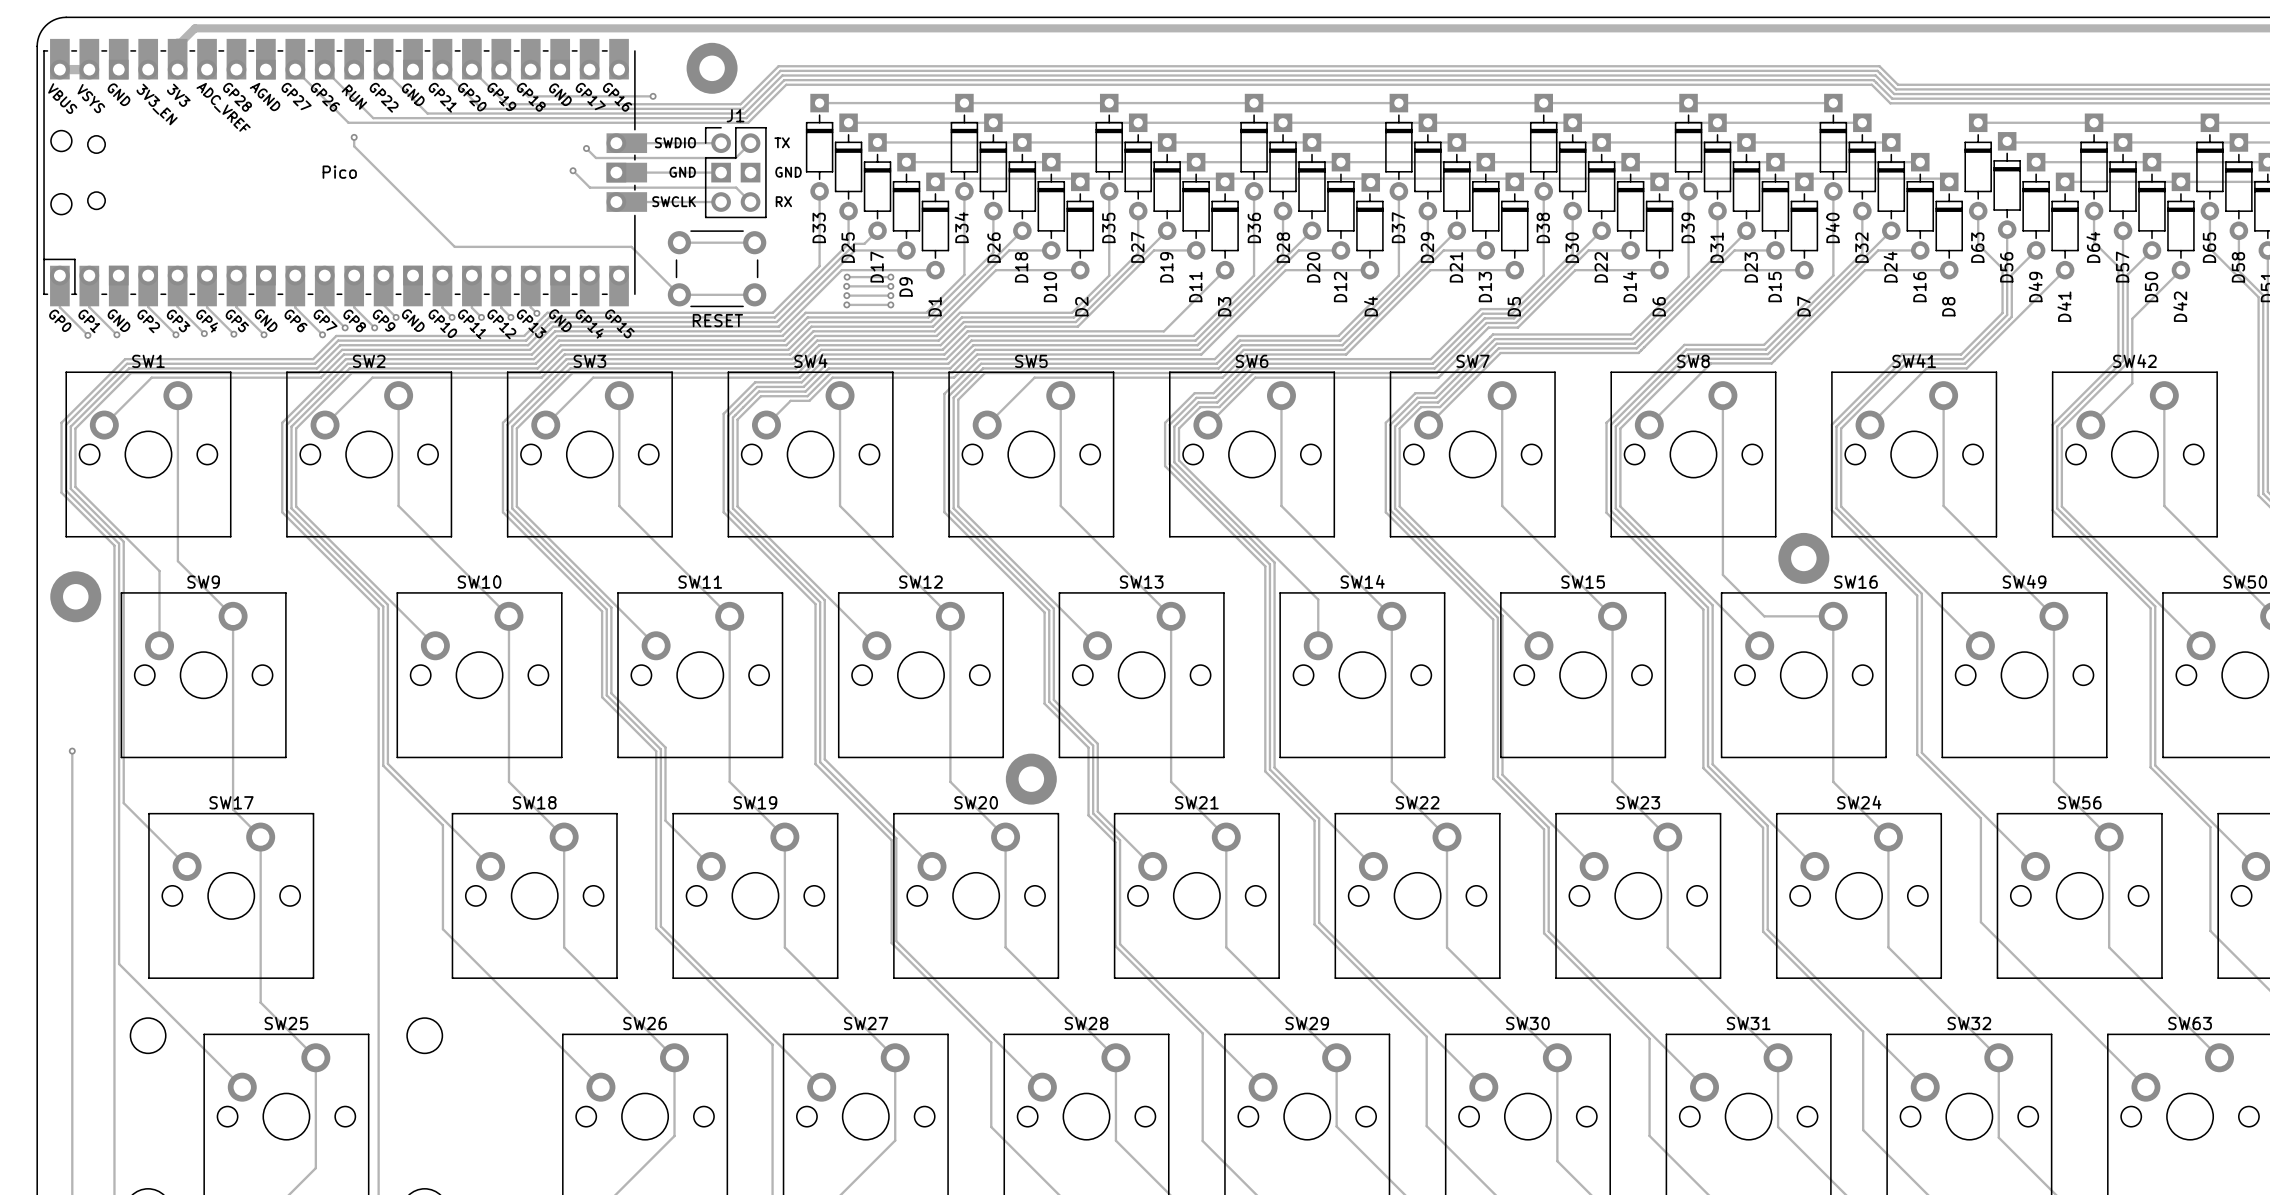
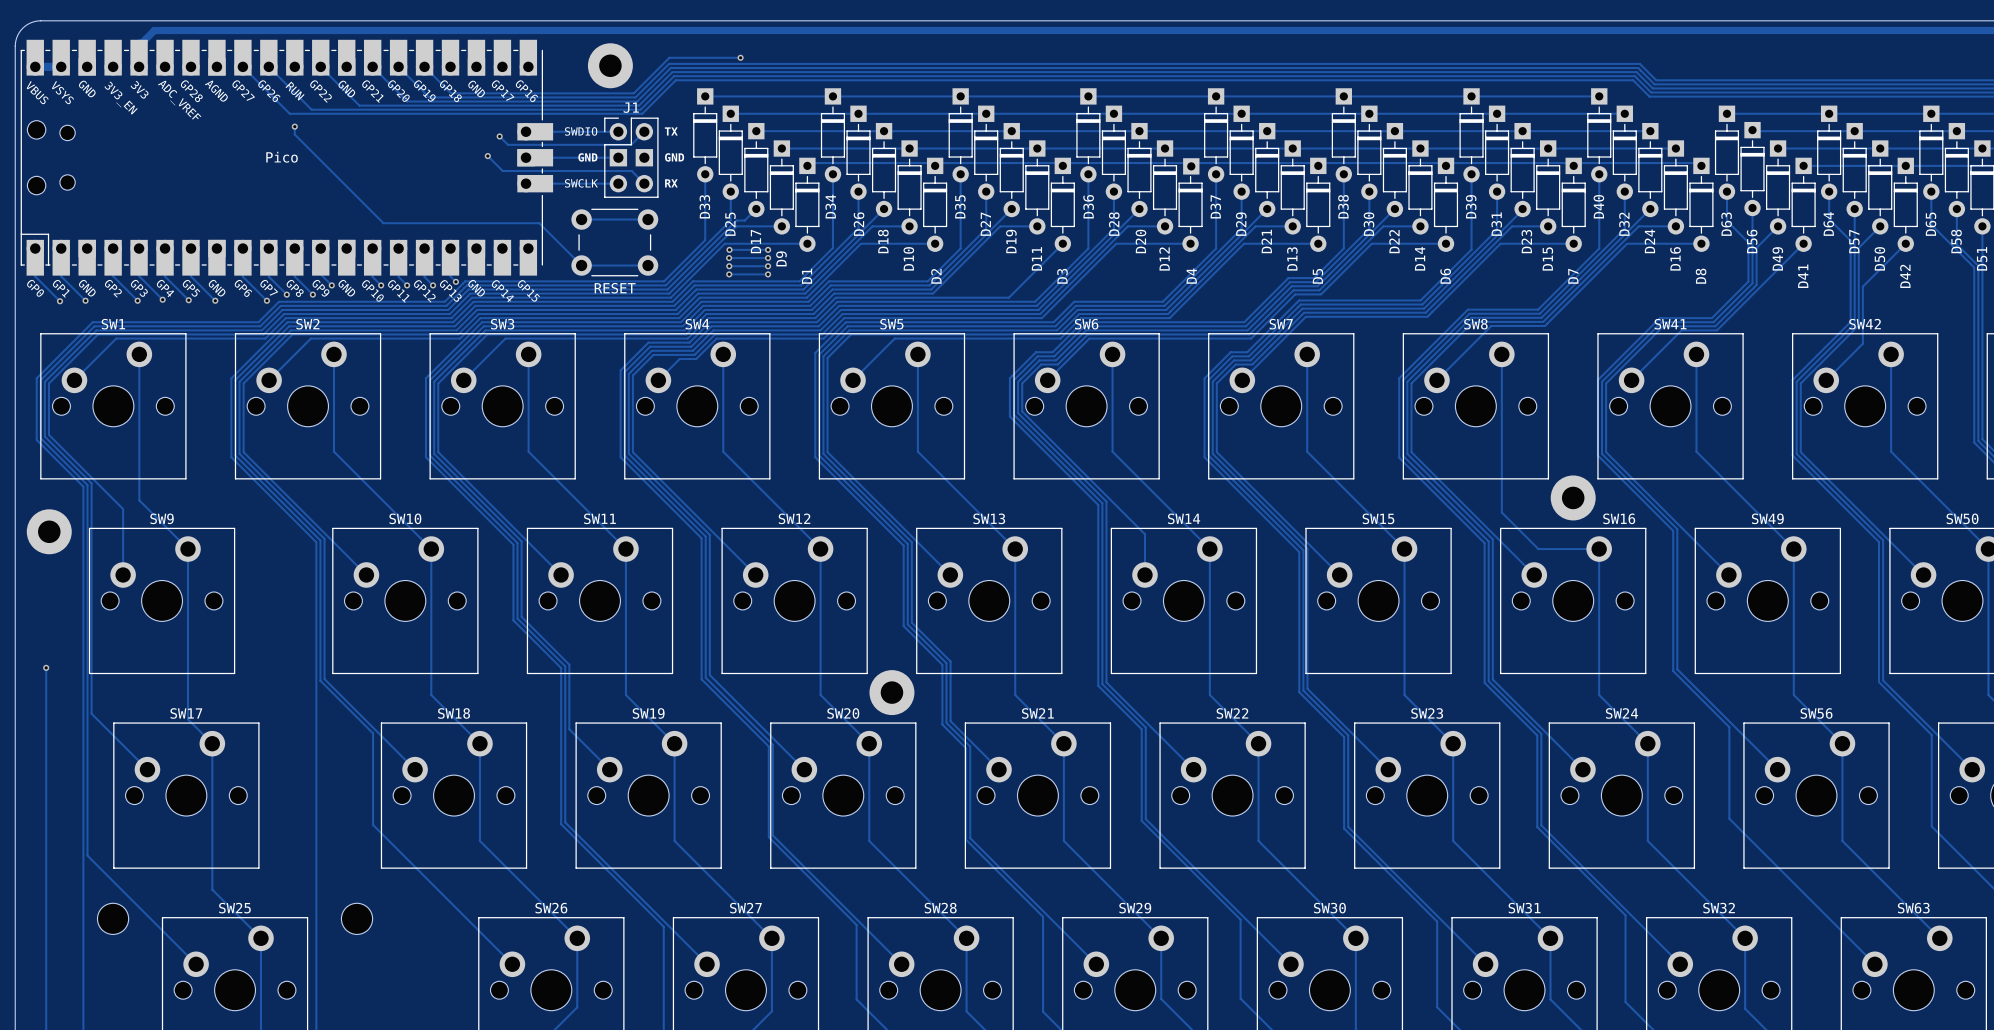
via: none -> (740, 57)
track: (528, 96) (653, 96) -> (448, 90) (451, 93) (633, 93) (669, 57) (740, 57)
via: (653, 96) -> none

